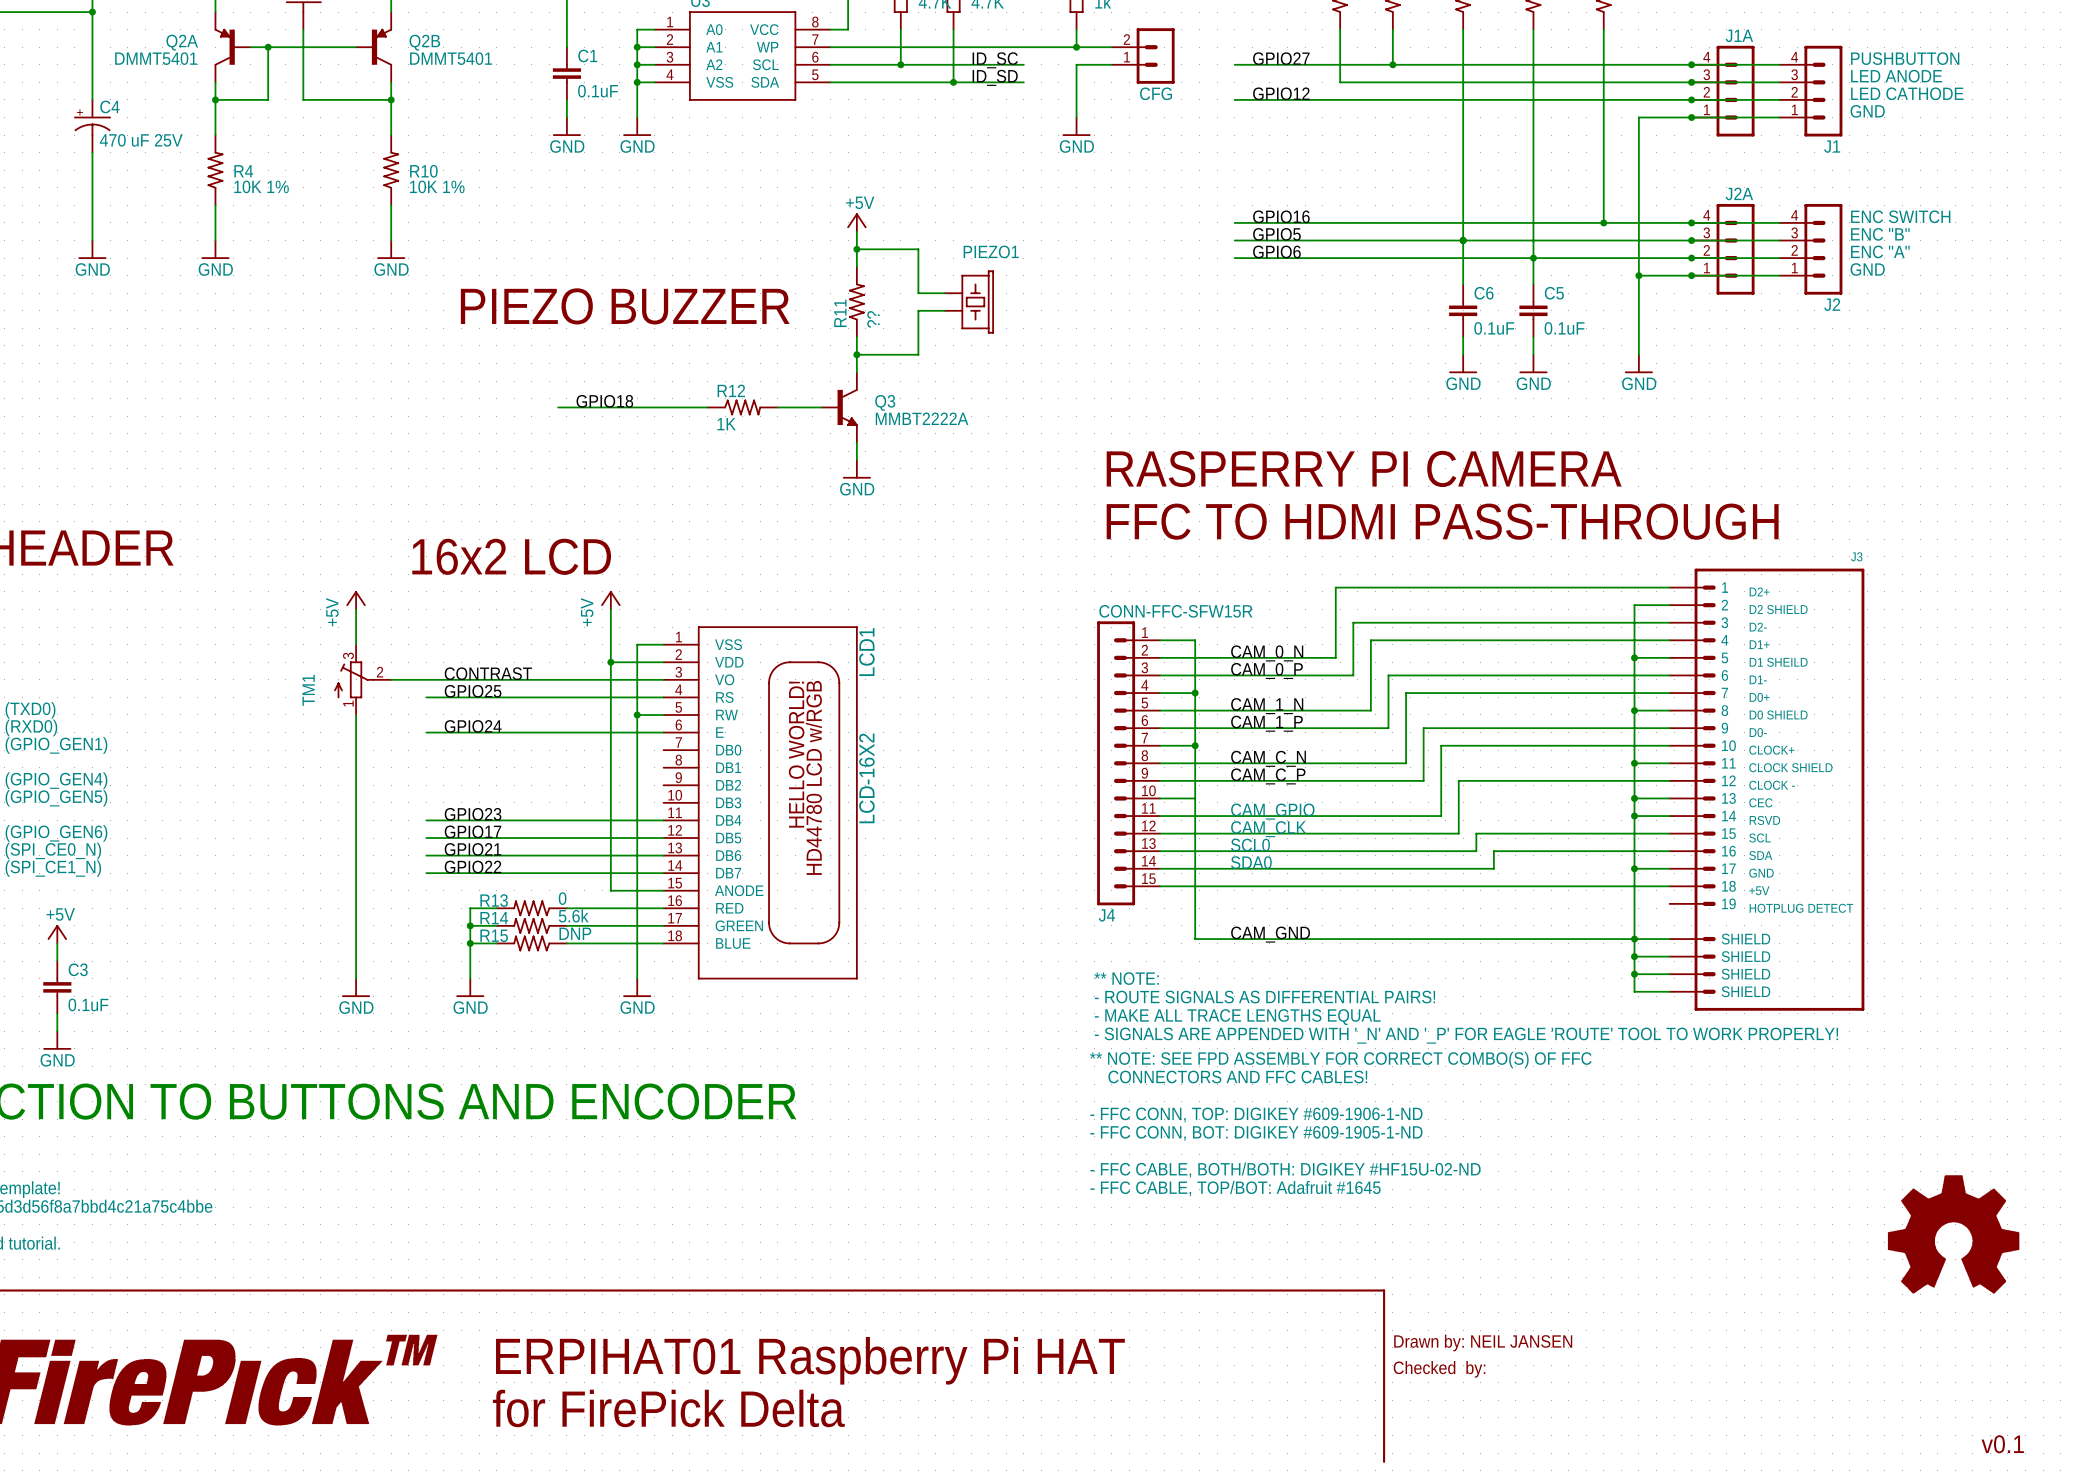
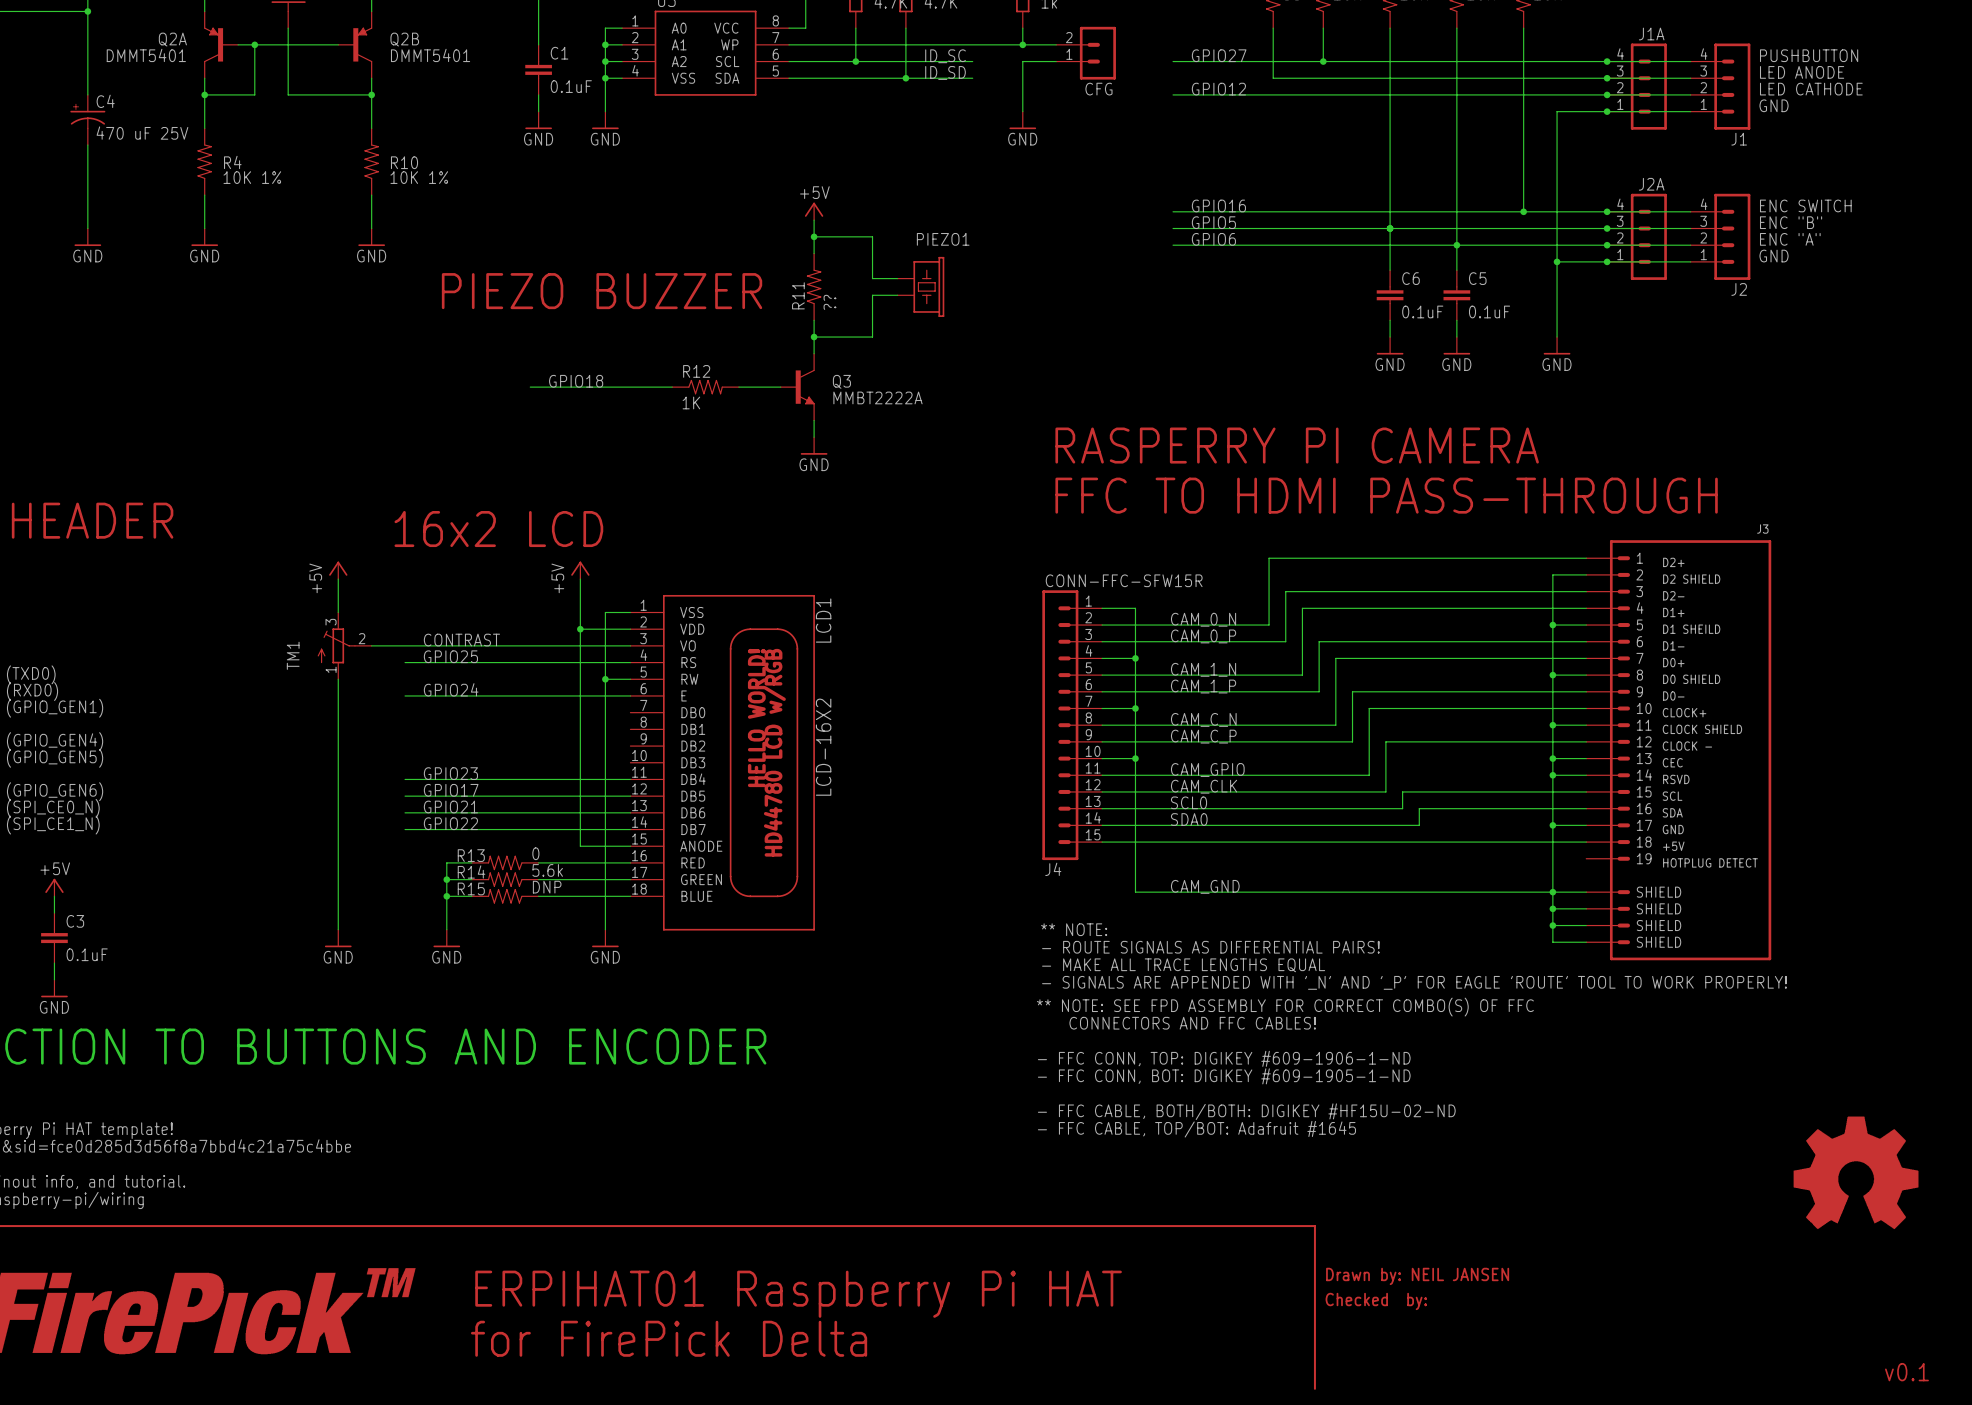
junction: none -> (1135, 758)

